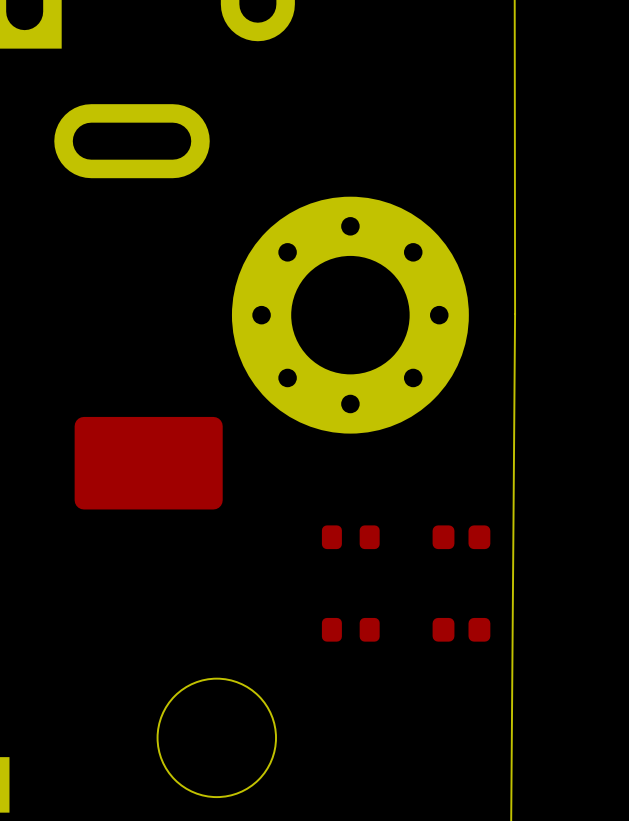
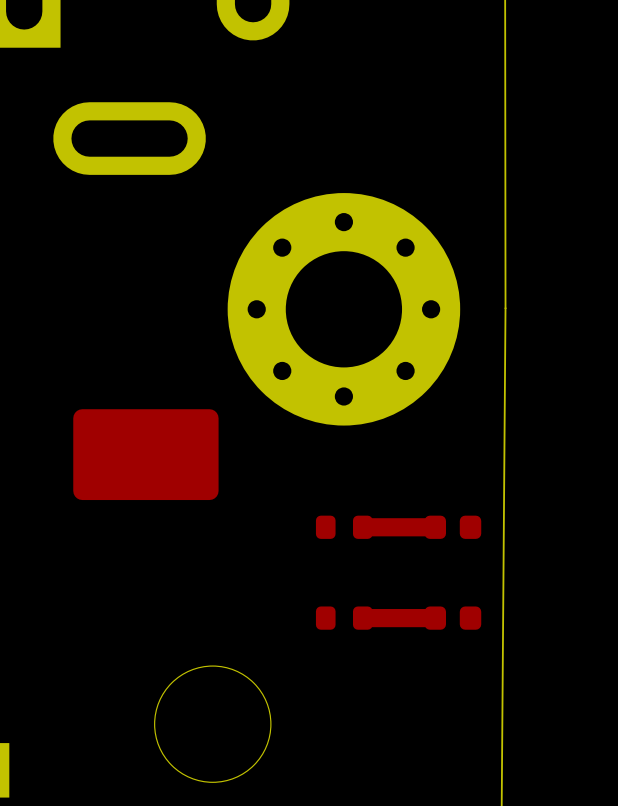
top track: none -> (435, 527) (362, 527)
top track: none -> (435, 618) (362, 618)

